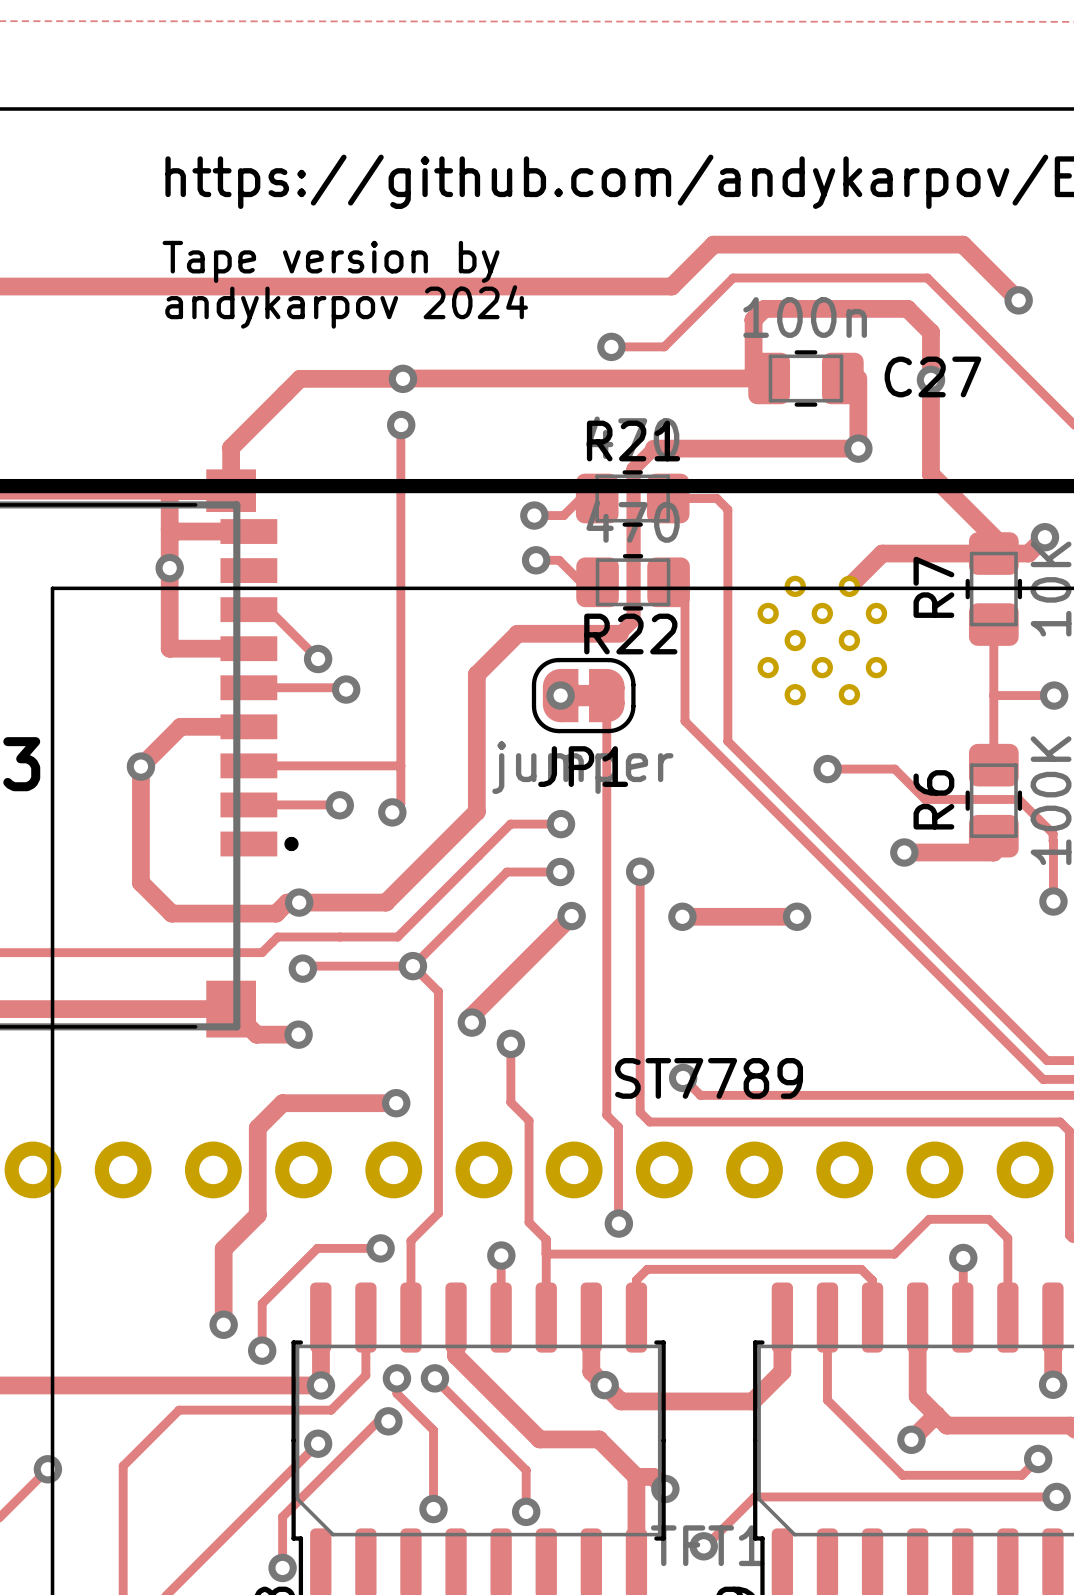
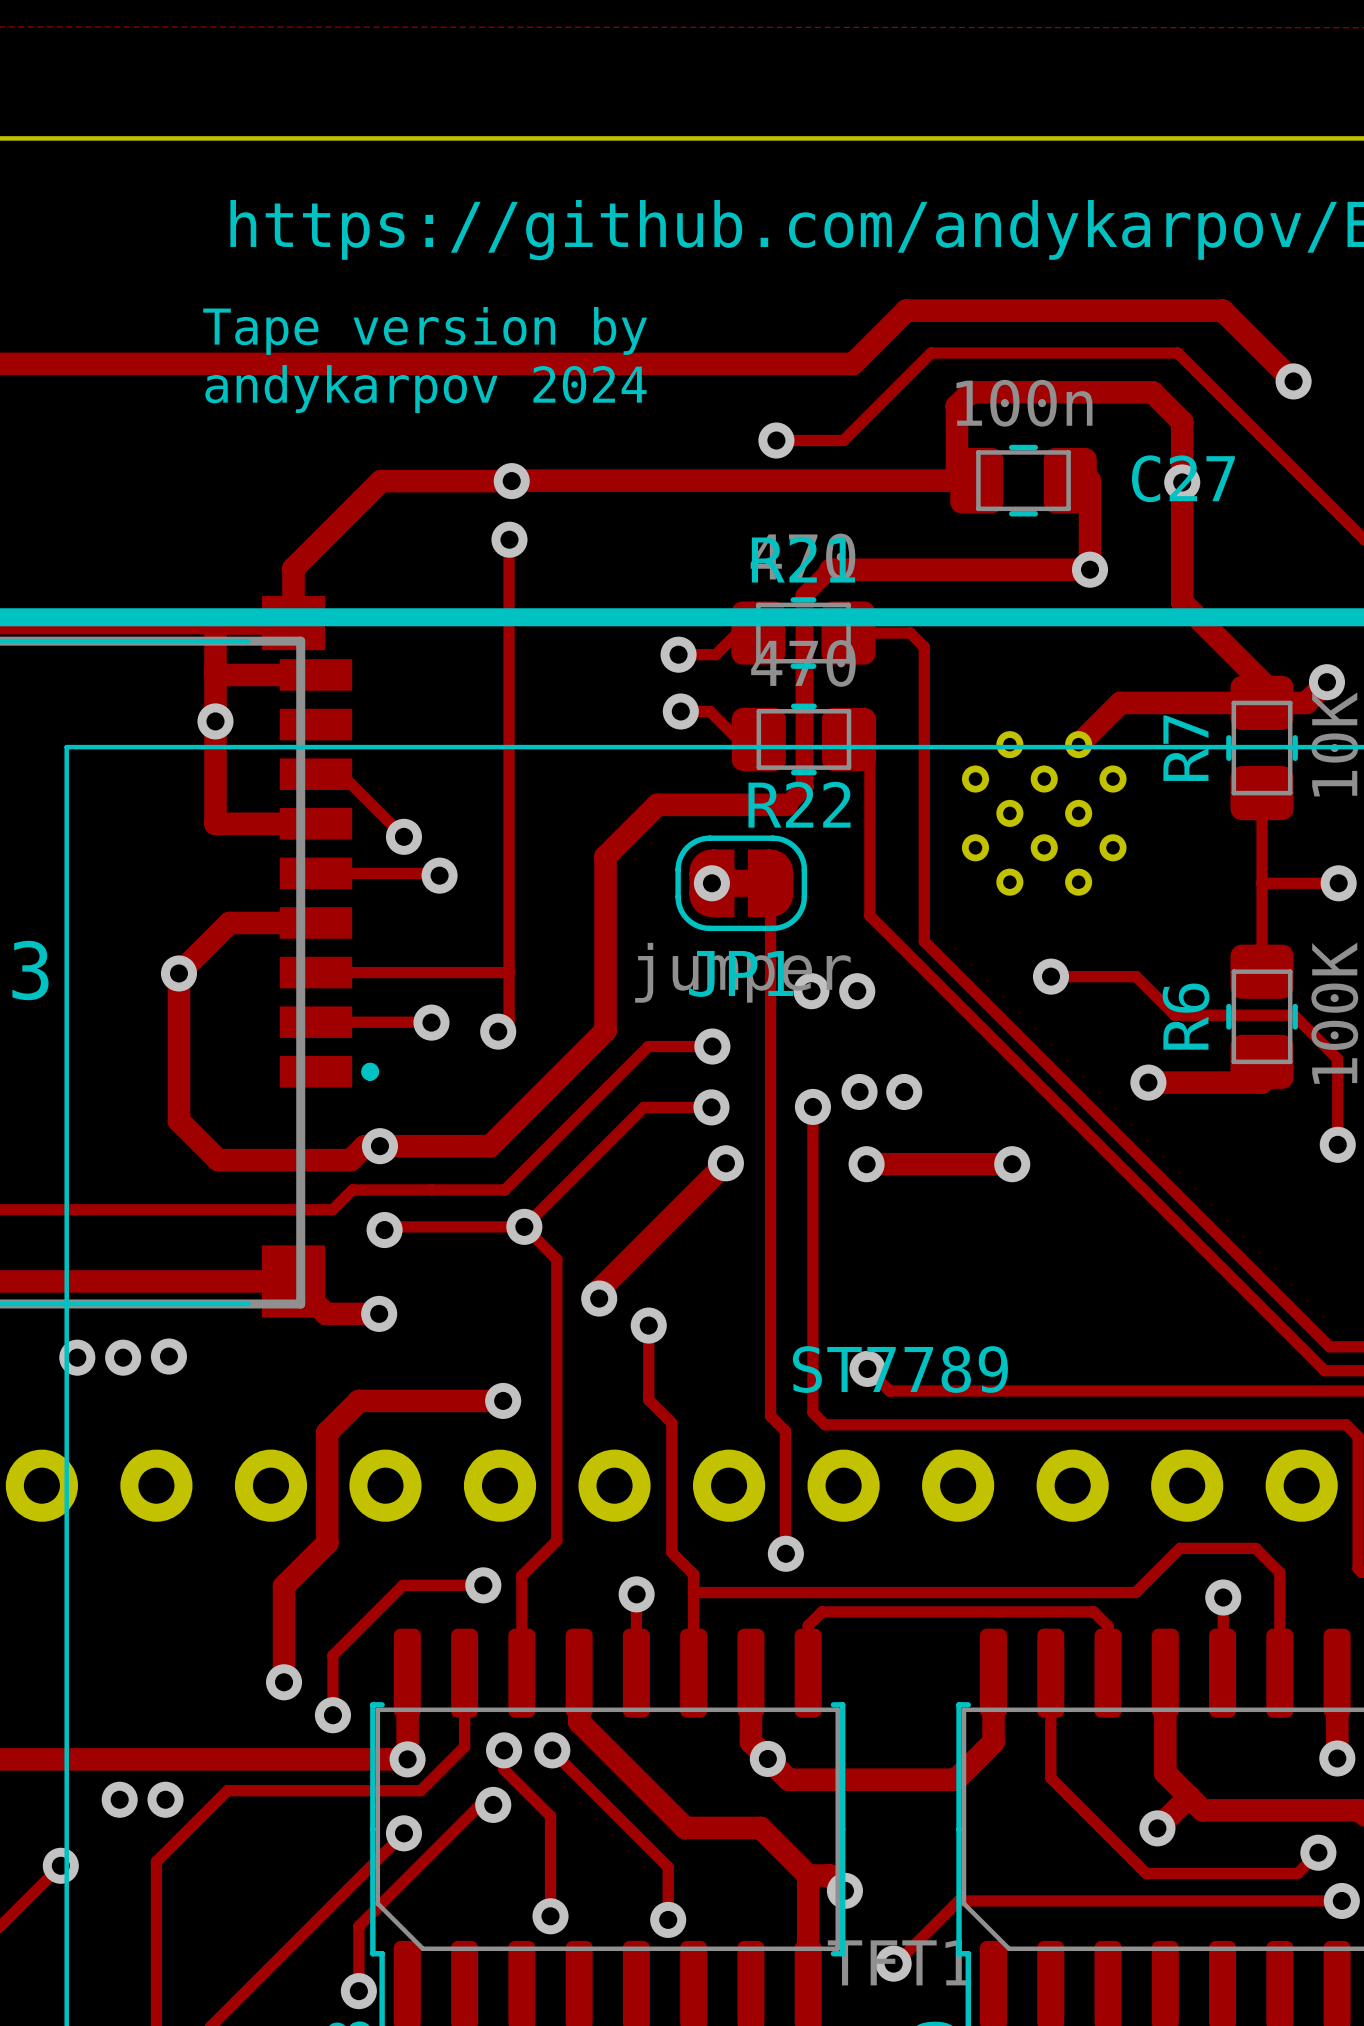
via: none -> (811, 991)
via: none -> (857, 991)
via: none -> (859, 1091)
via: none -> (904, 1091)
via: none -> (168, 1356)
via: none -> (77, 1357)
via: none -> (123, 1357)
via: none -> (119, 1799)
via: none -> (165, 1799)

